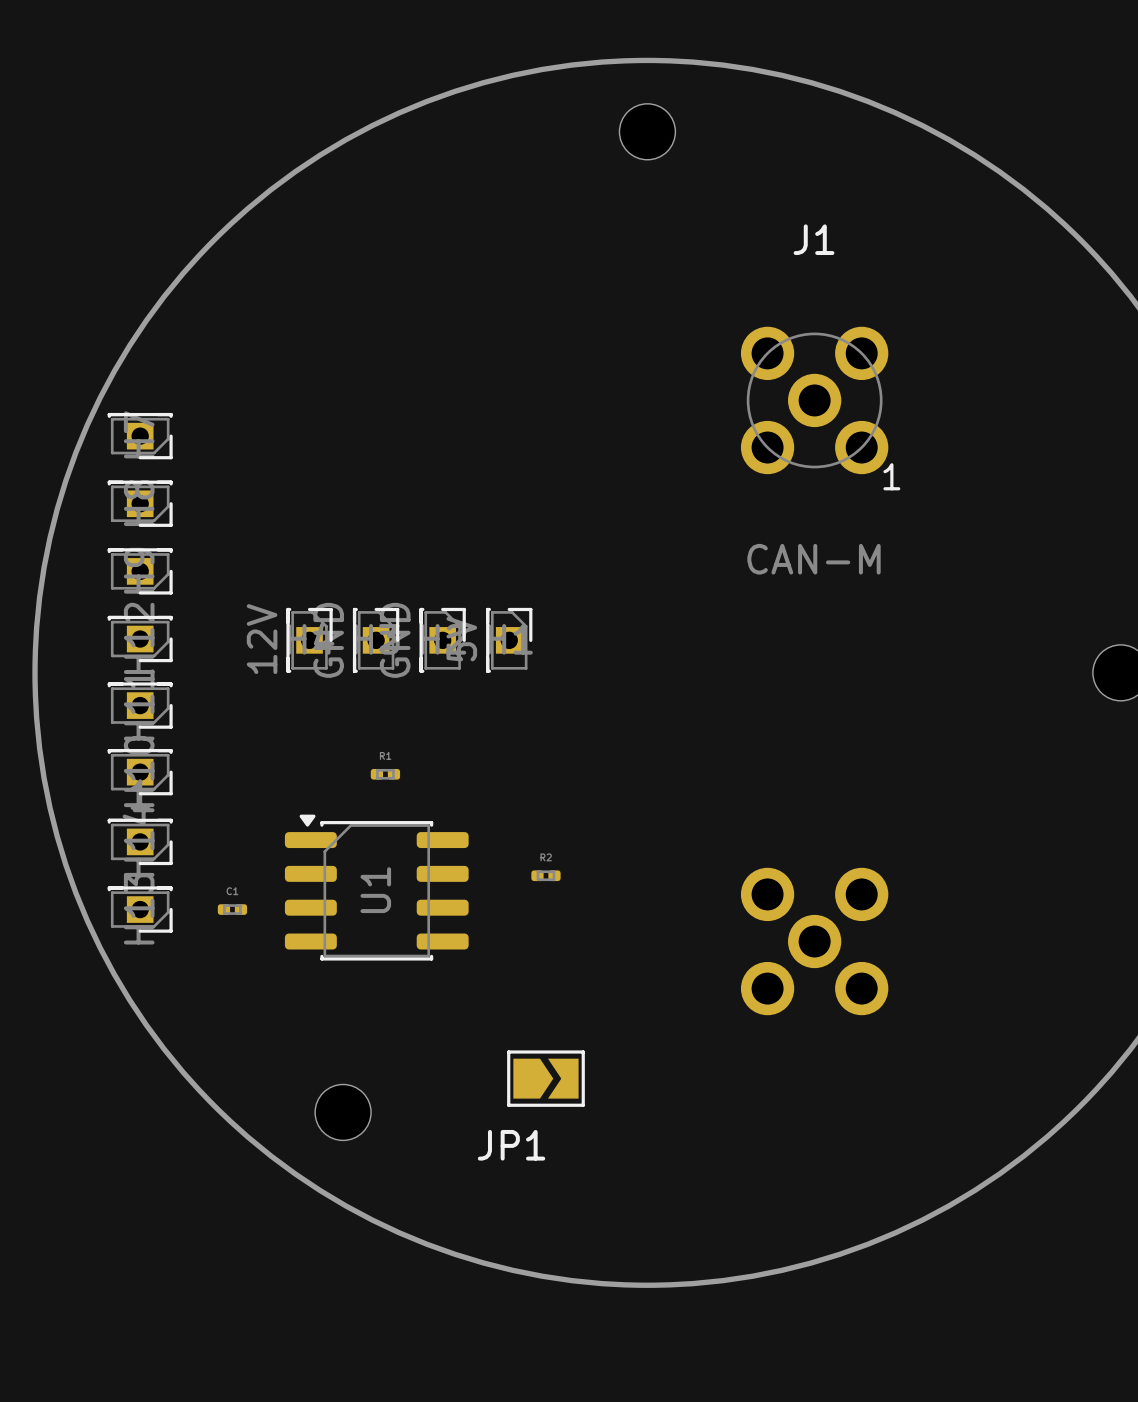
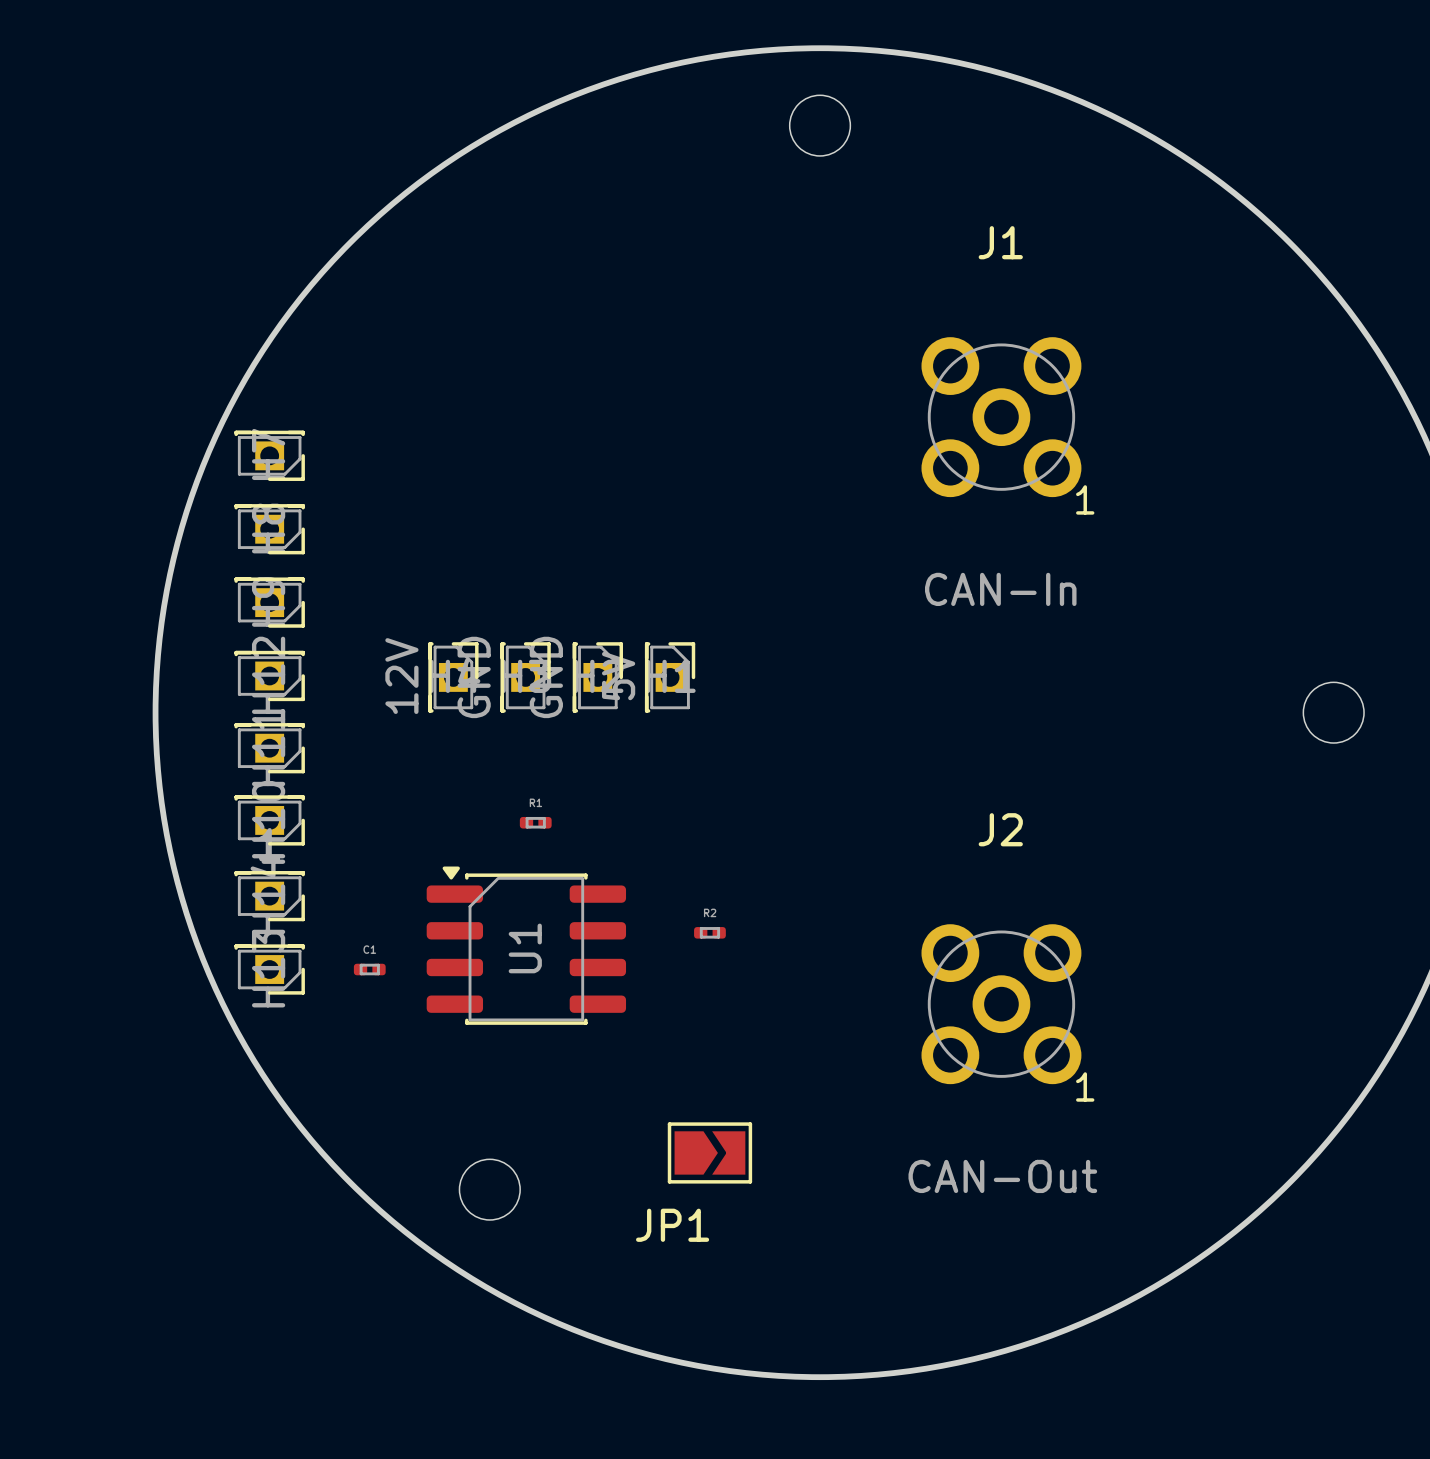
J1 value: CAN-M (814, 559) -> CAN-In (1000, 589)
J2 side: bottom (814, 941) -> top (1001, 1004)

